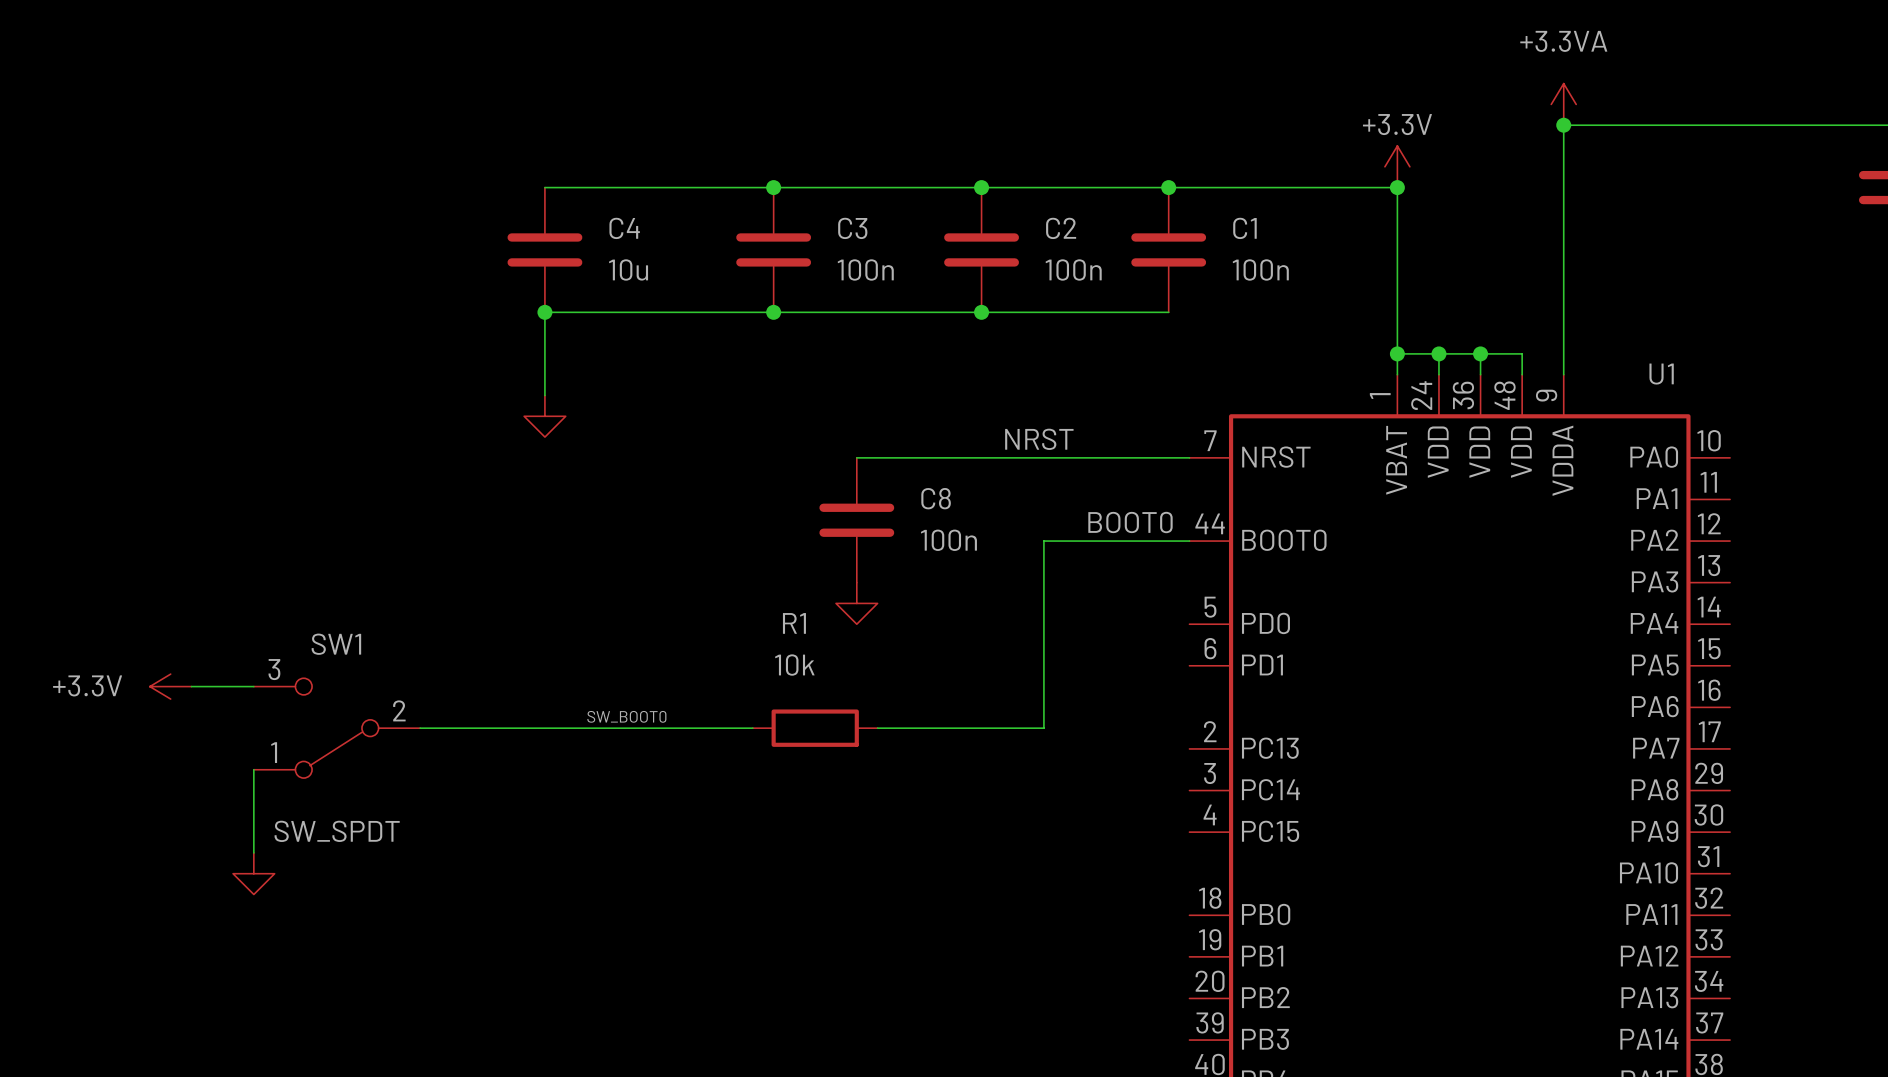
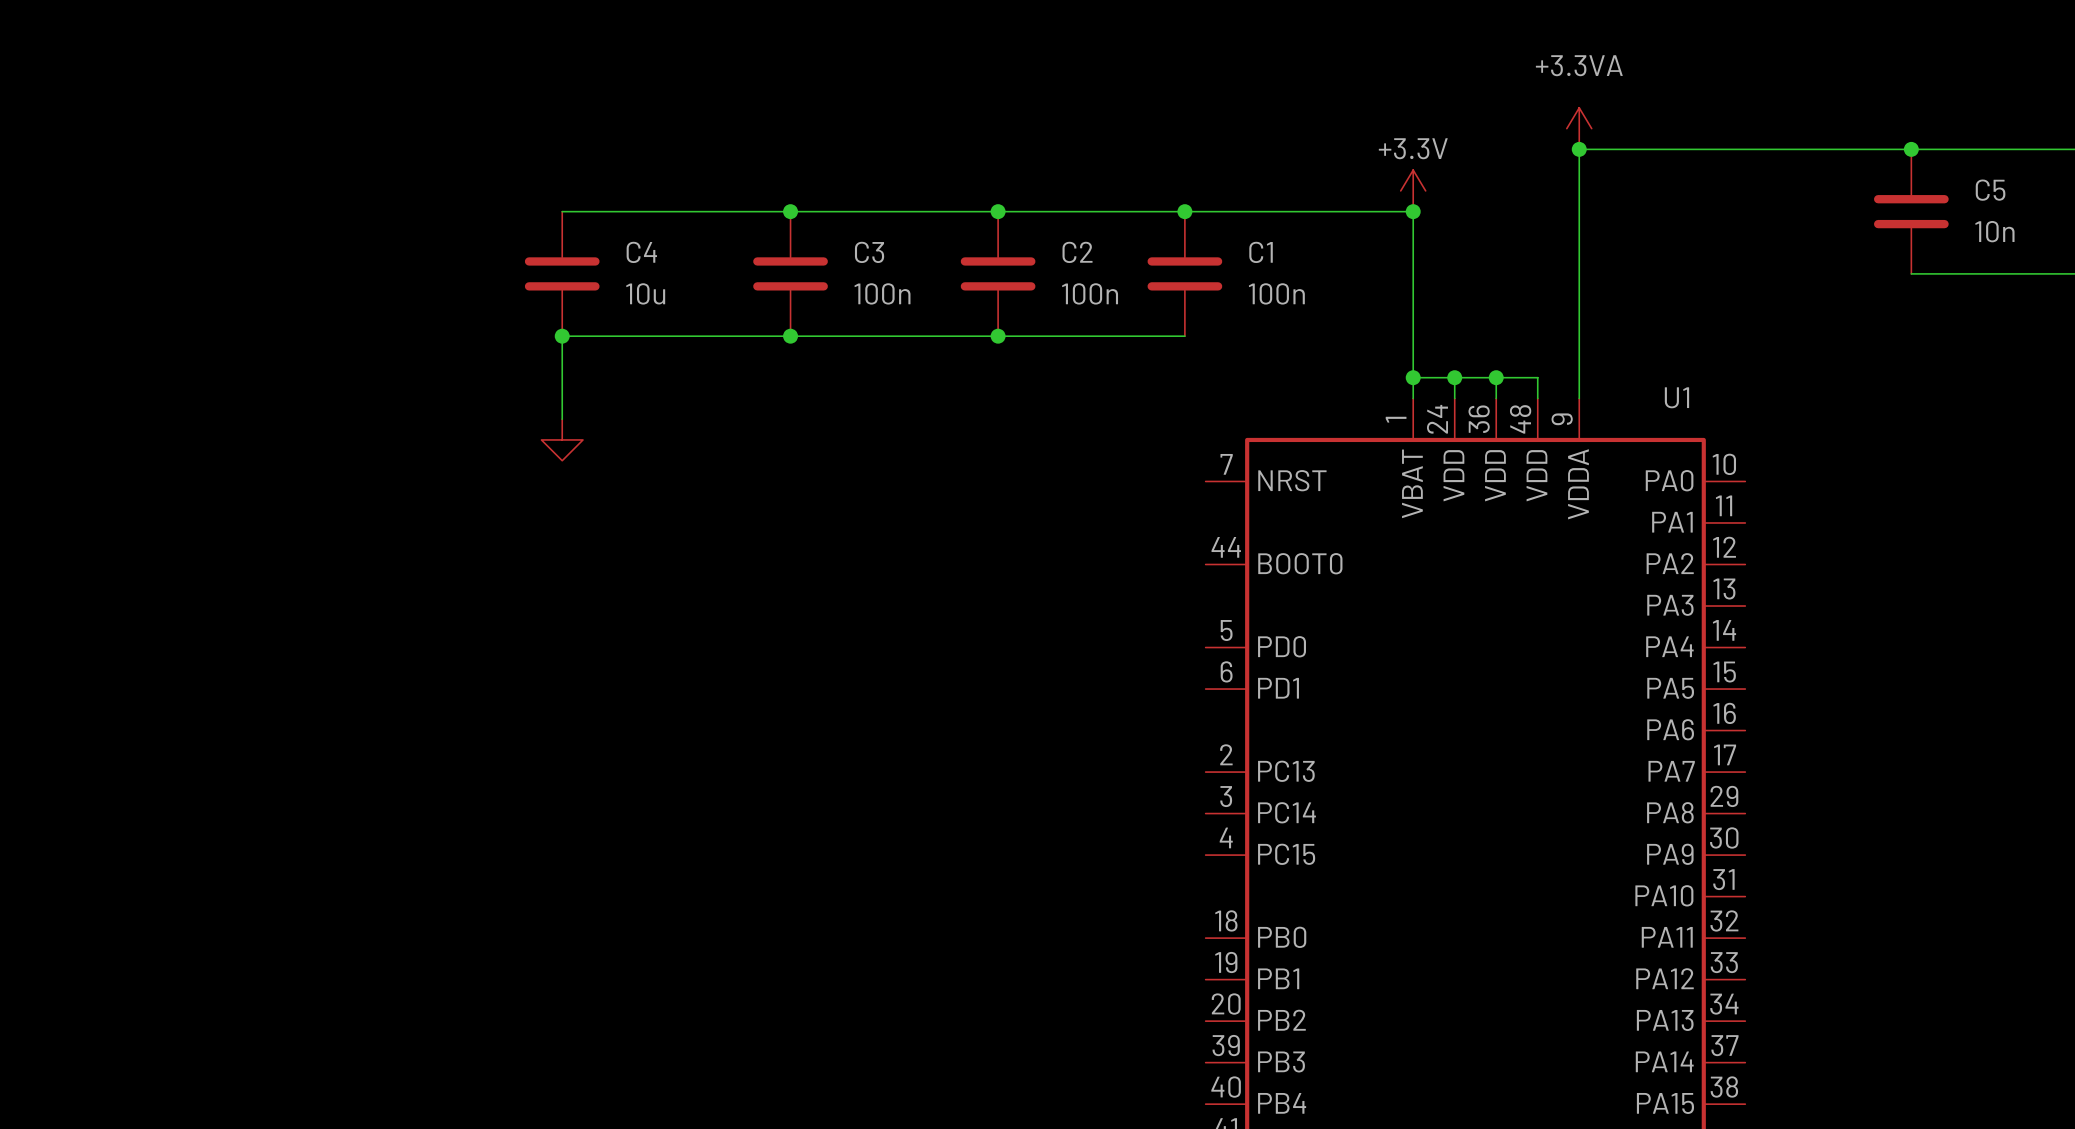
label: NRST (1039, 439) -> none
wire: (856, 457) (1189, 457) -> none
C8: 100n (856, 520) -> none
label: BOOT0 (1130, 522) -> none
wire: (1189, 541) (1043, 541) (1043, 728) (877, 728) -> none
power symbol: (856, 603) -> none
power symbol: +3.3V (170, 686) -> none
wire: (191, 686) (253, 686) -> none
label: SW_BOOT0 (626, 716) -> none
SW1: SW_SPDT (337, 728) -> none
wire: (420, 728) (752, 728) -> none
R1: 10k (815, 728) -> none
wire: (253, 769) (253, 852) -> none
power symbol: (253, 873) -> none

